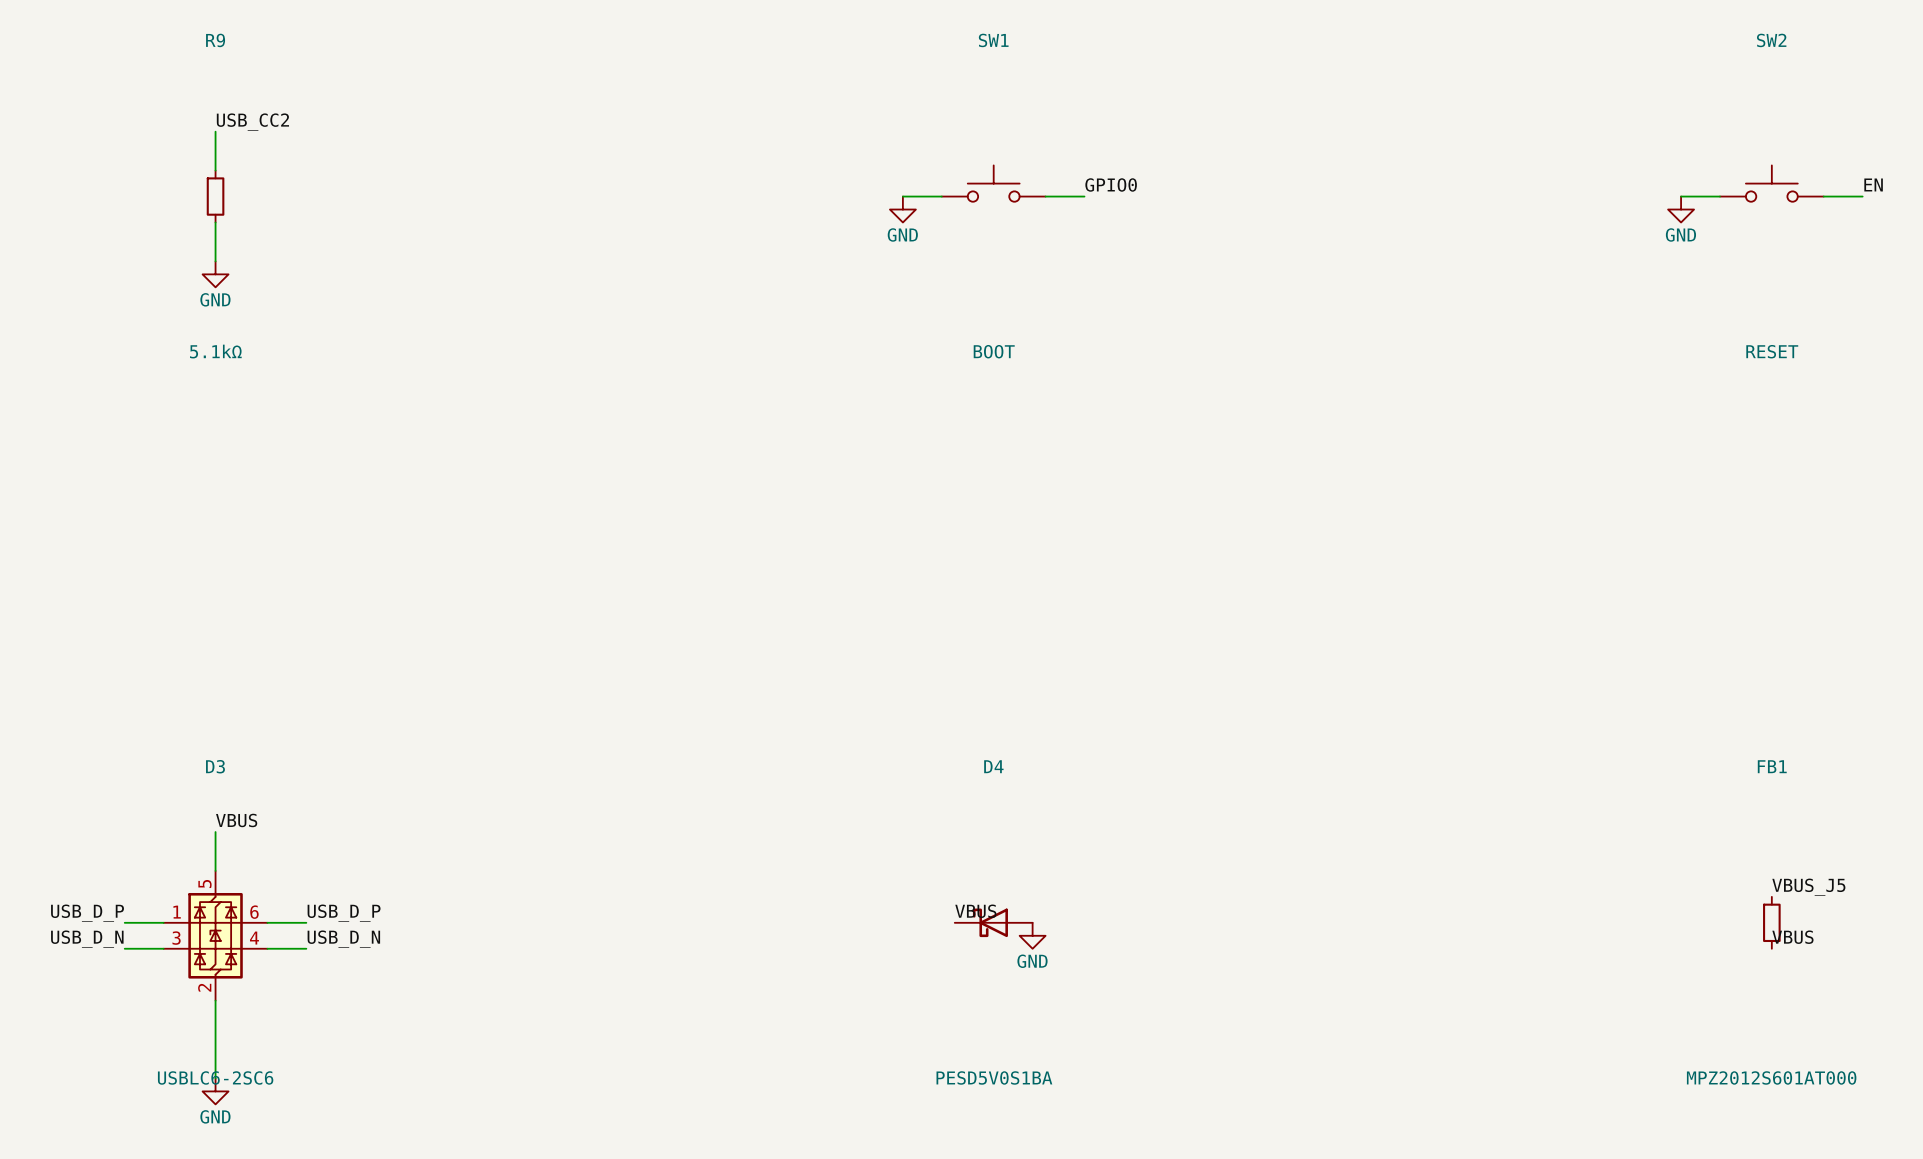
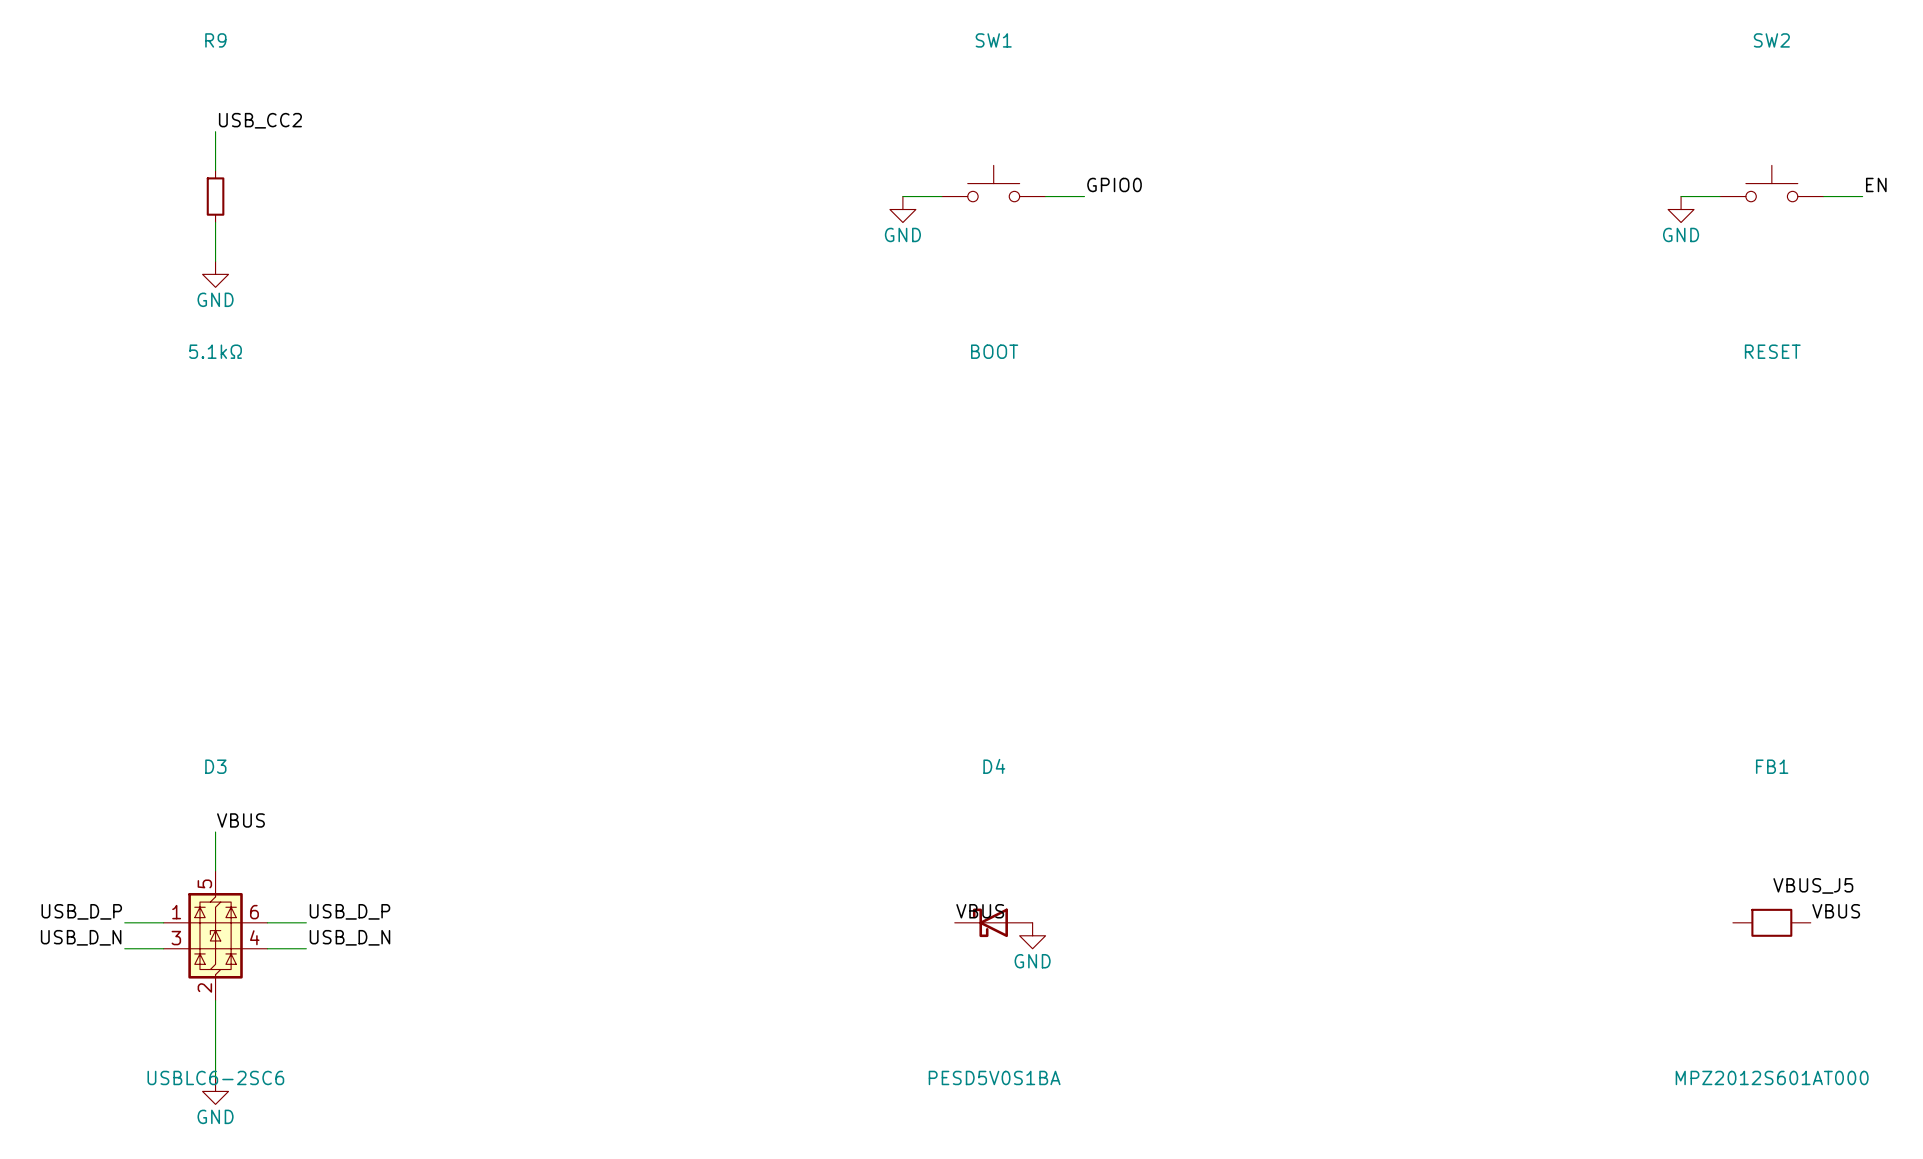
FB1 symbol: [1763, 896, 1781, 949] -> [1732, 908, 1811, 937]
label position: VBUS (1792, 937) -> VBUS (1836, 911)

